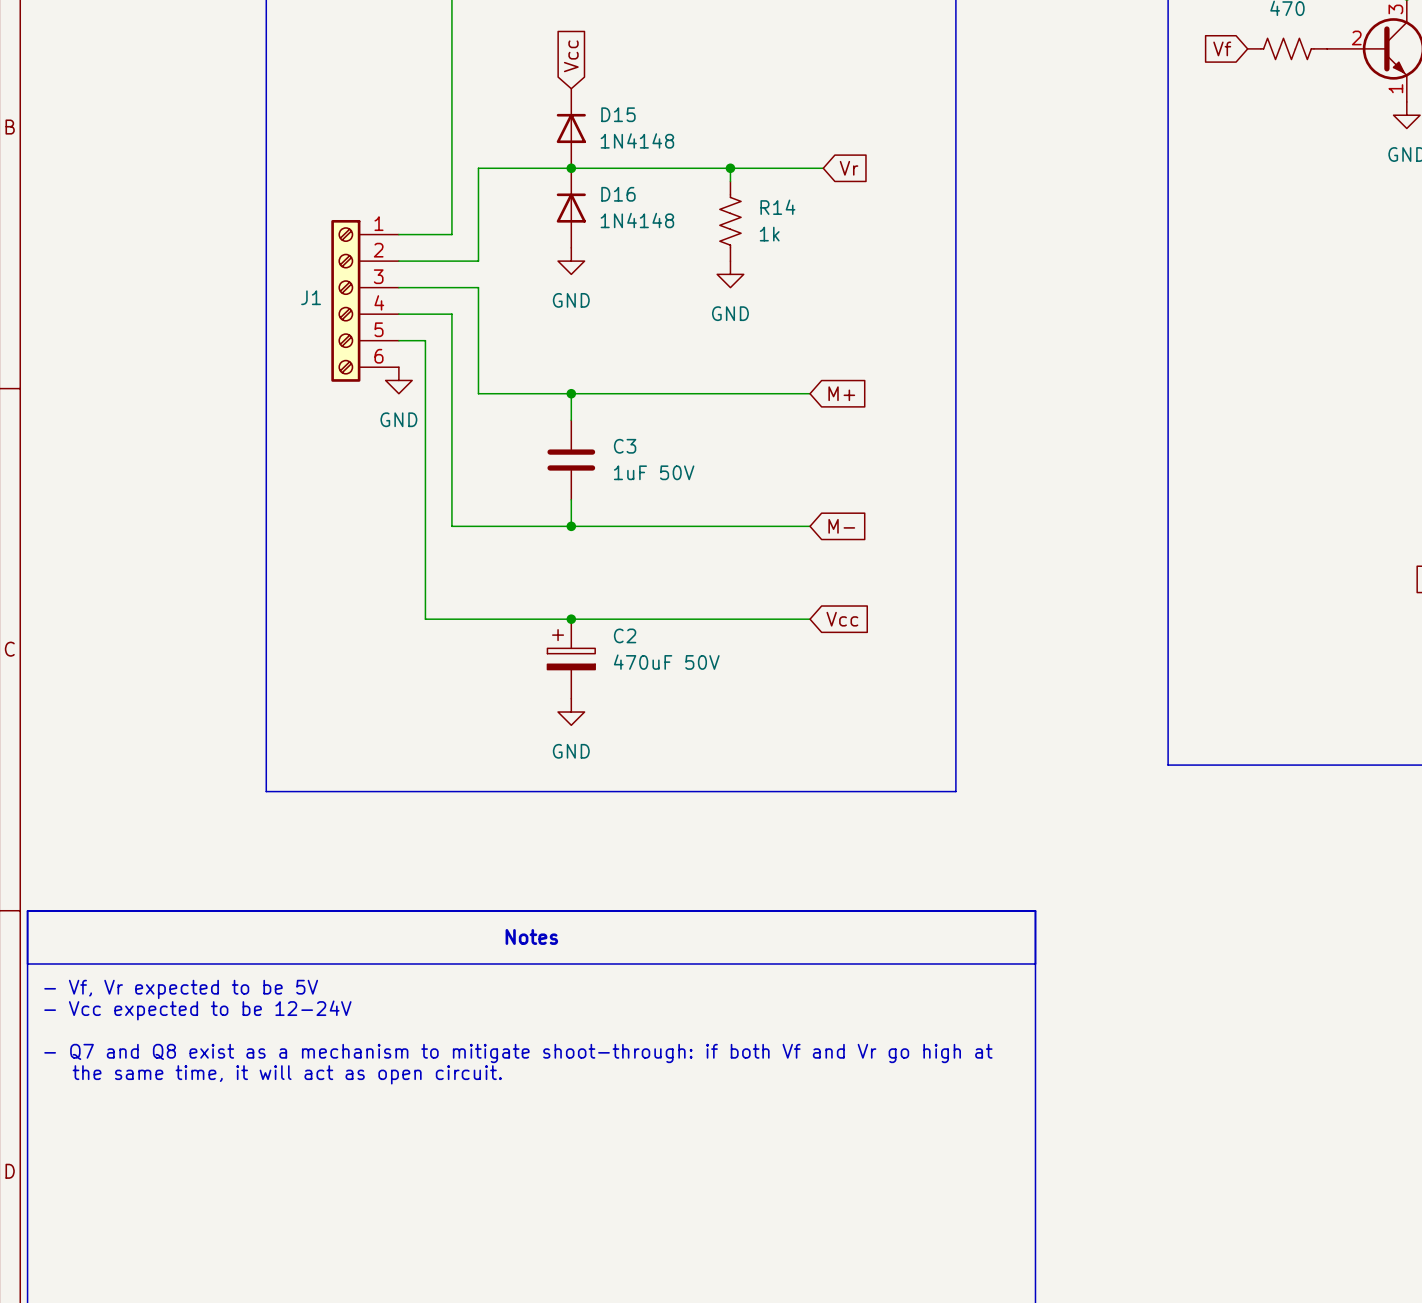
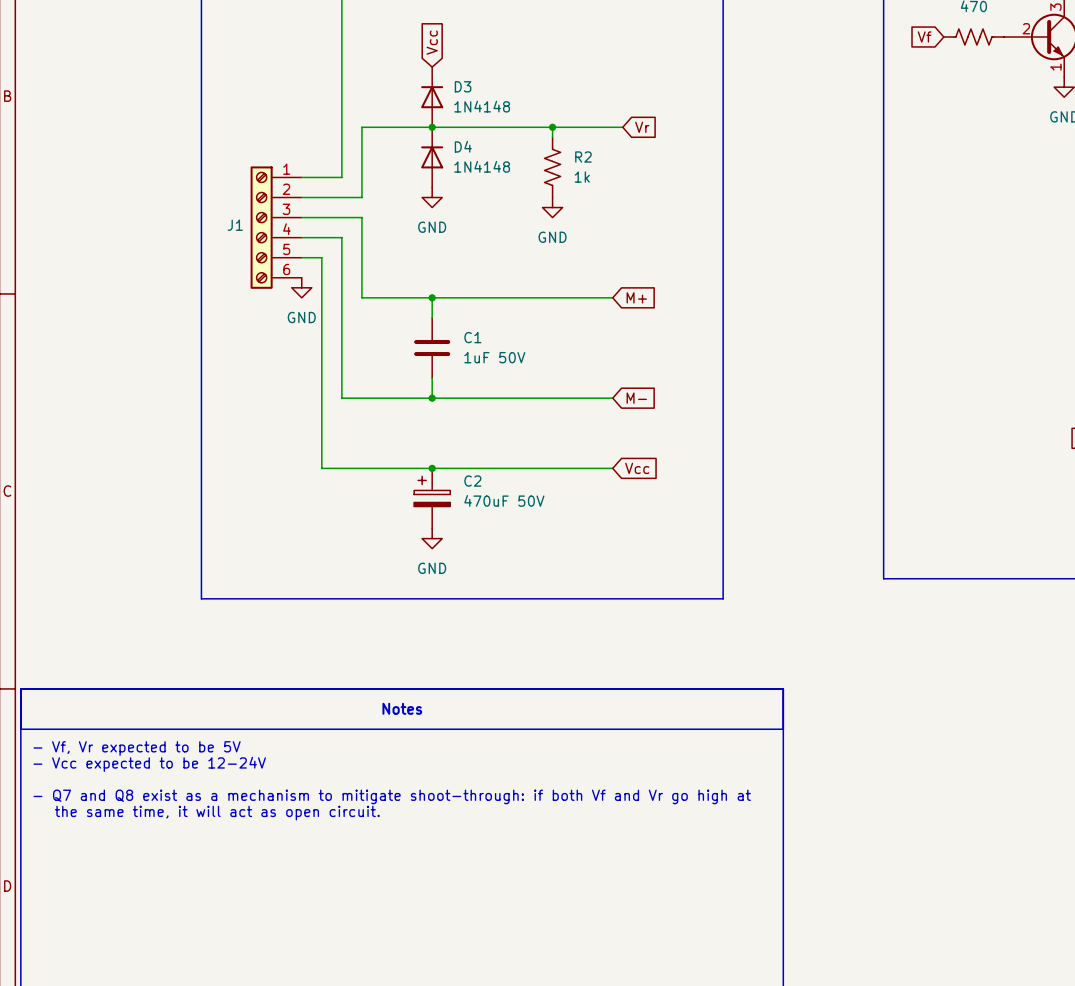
D15 name: D15 (618, 114) -> D3 (463, 86)
D16 name: D16 (618, 194) -> D4 (463, 146)
R14 name: R14 (777, 207) -> R2 (583, 157)
C3 name: C3 (625, 446) -> C1 (472, 337)

